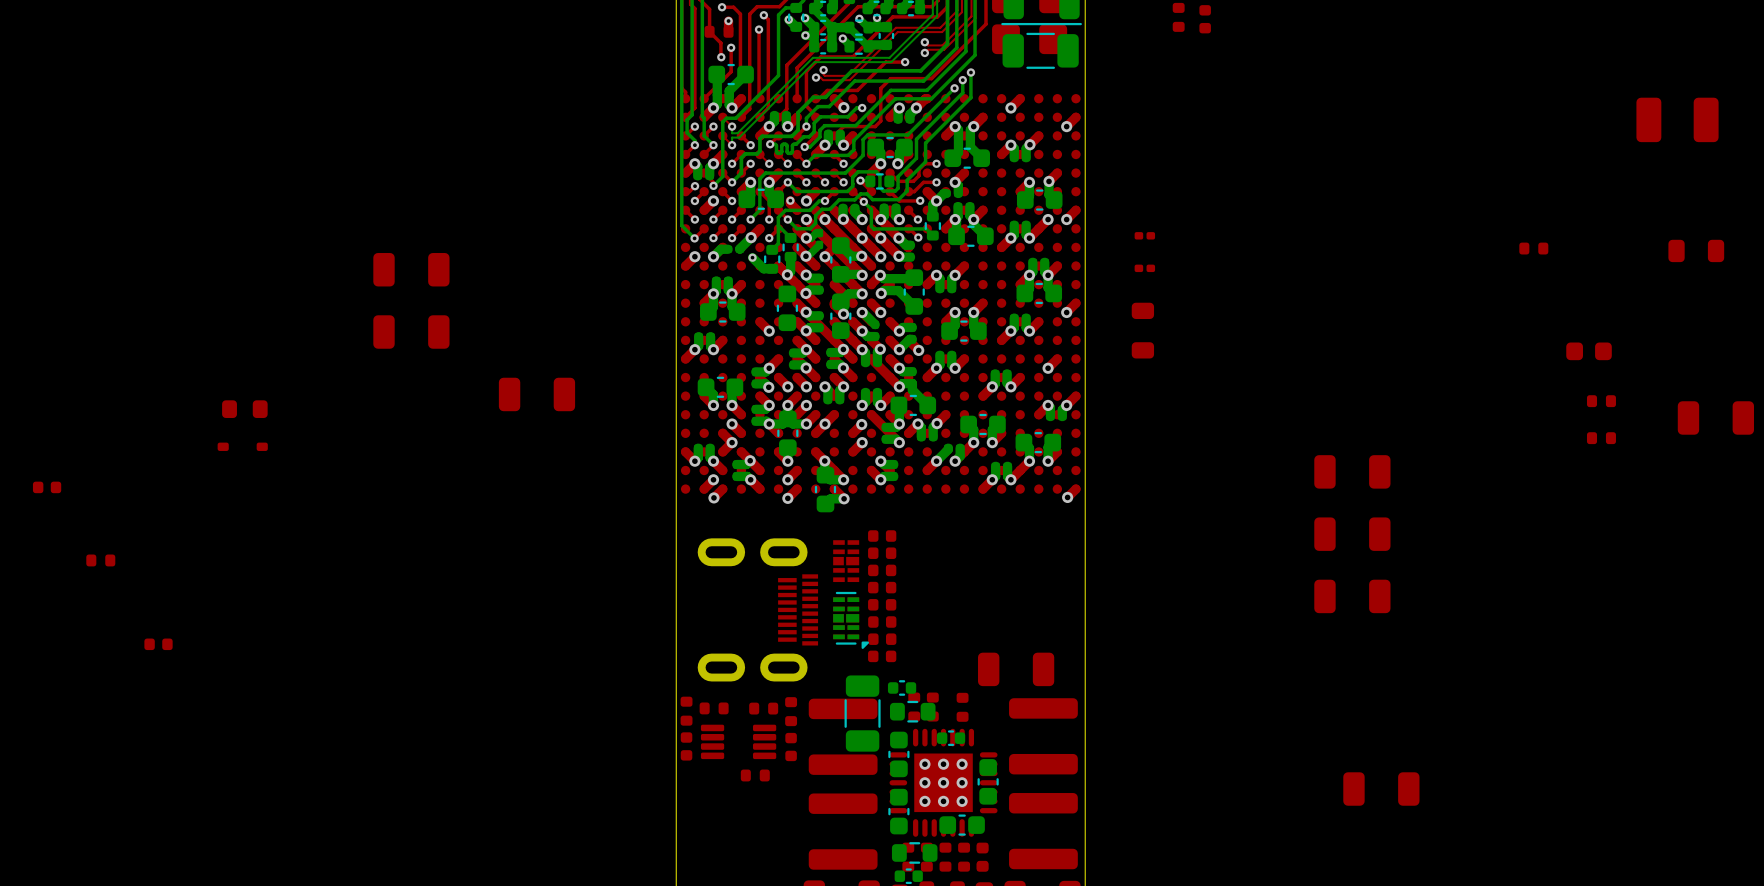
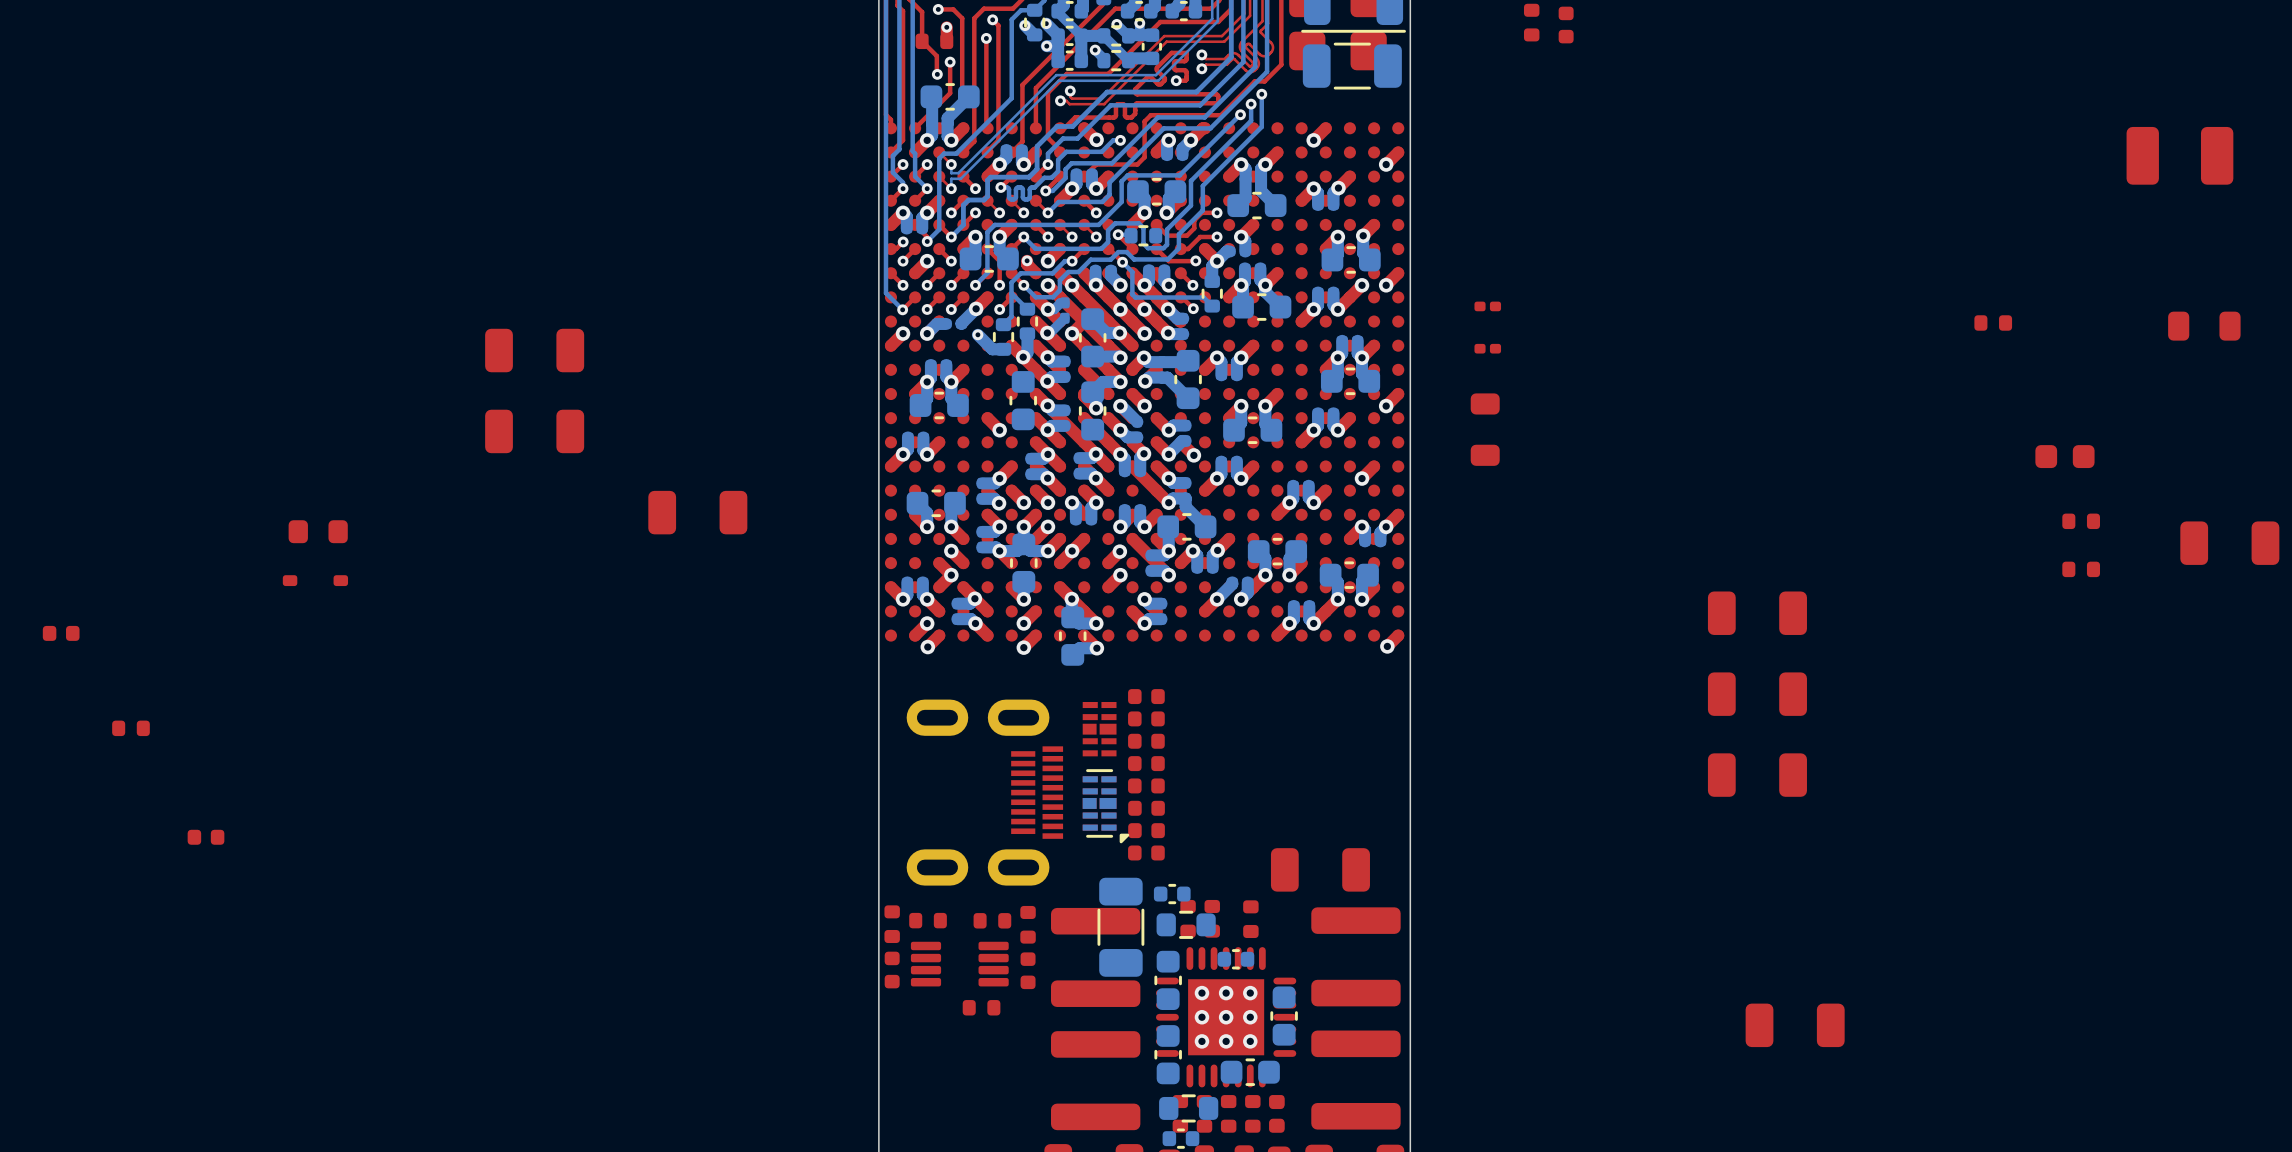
top track: (970, 23) (960, 33) -> (1260, 30) (1272, 44) (1271, 52) (1267, 55) (1261, 55) (1247, 44)
top track: (986, 24) (931, 78) (890, 78) (880, 88) (880, 93) -> (1281, 31) (1281, 64) (1264, 81) (1254, 81) (1220, 115) (1150, 115) (1144, 121)
top track: (955, 32) (945, 42) -> (1241, 41) (1240, 49) (1253, 62) (1251, 66) (1236, 53) (1228, 55)
top track: (958, 35) (948, 45) -> (1245, 45) (1258, 61) (1258, 65) (1255, 70) (1247, 71) (1232, 59)
top track: (905, 62) (885, 62) (857, 90) -> (1176, 80) (1186, 79) (1185, 70) (1175, 70) (1174, 67) (1175, 61) (1186, 60) (1186, 52) (1171, 52) (1156, 68) (1164, 78) (1164, 80) (1158, 84) (1148, 76) (1135, 89) (1135, 92) (1216, 94) (1218, 96) (1218, 102) (1136, 103) (1135, 113) (1131, 117) (1125, 116) (1124, 104) (1117, 104) (1116, 105) (1115, 116) (1113, 117)

